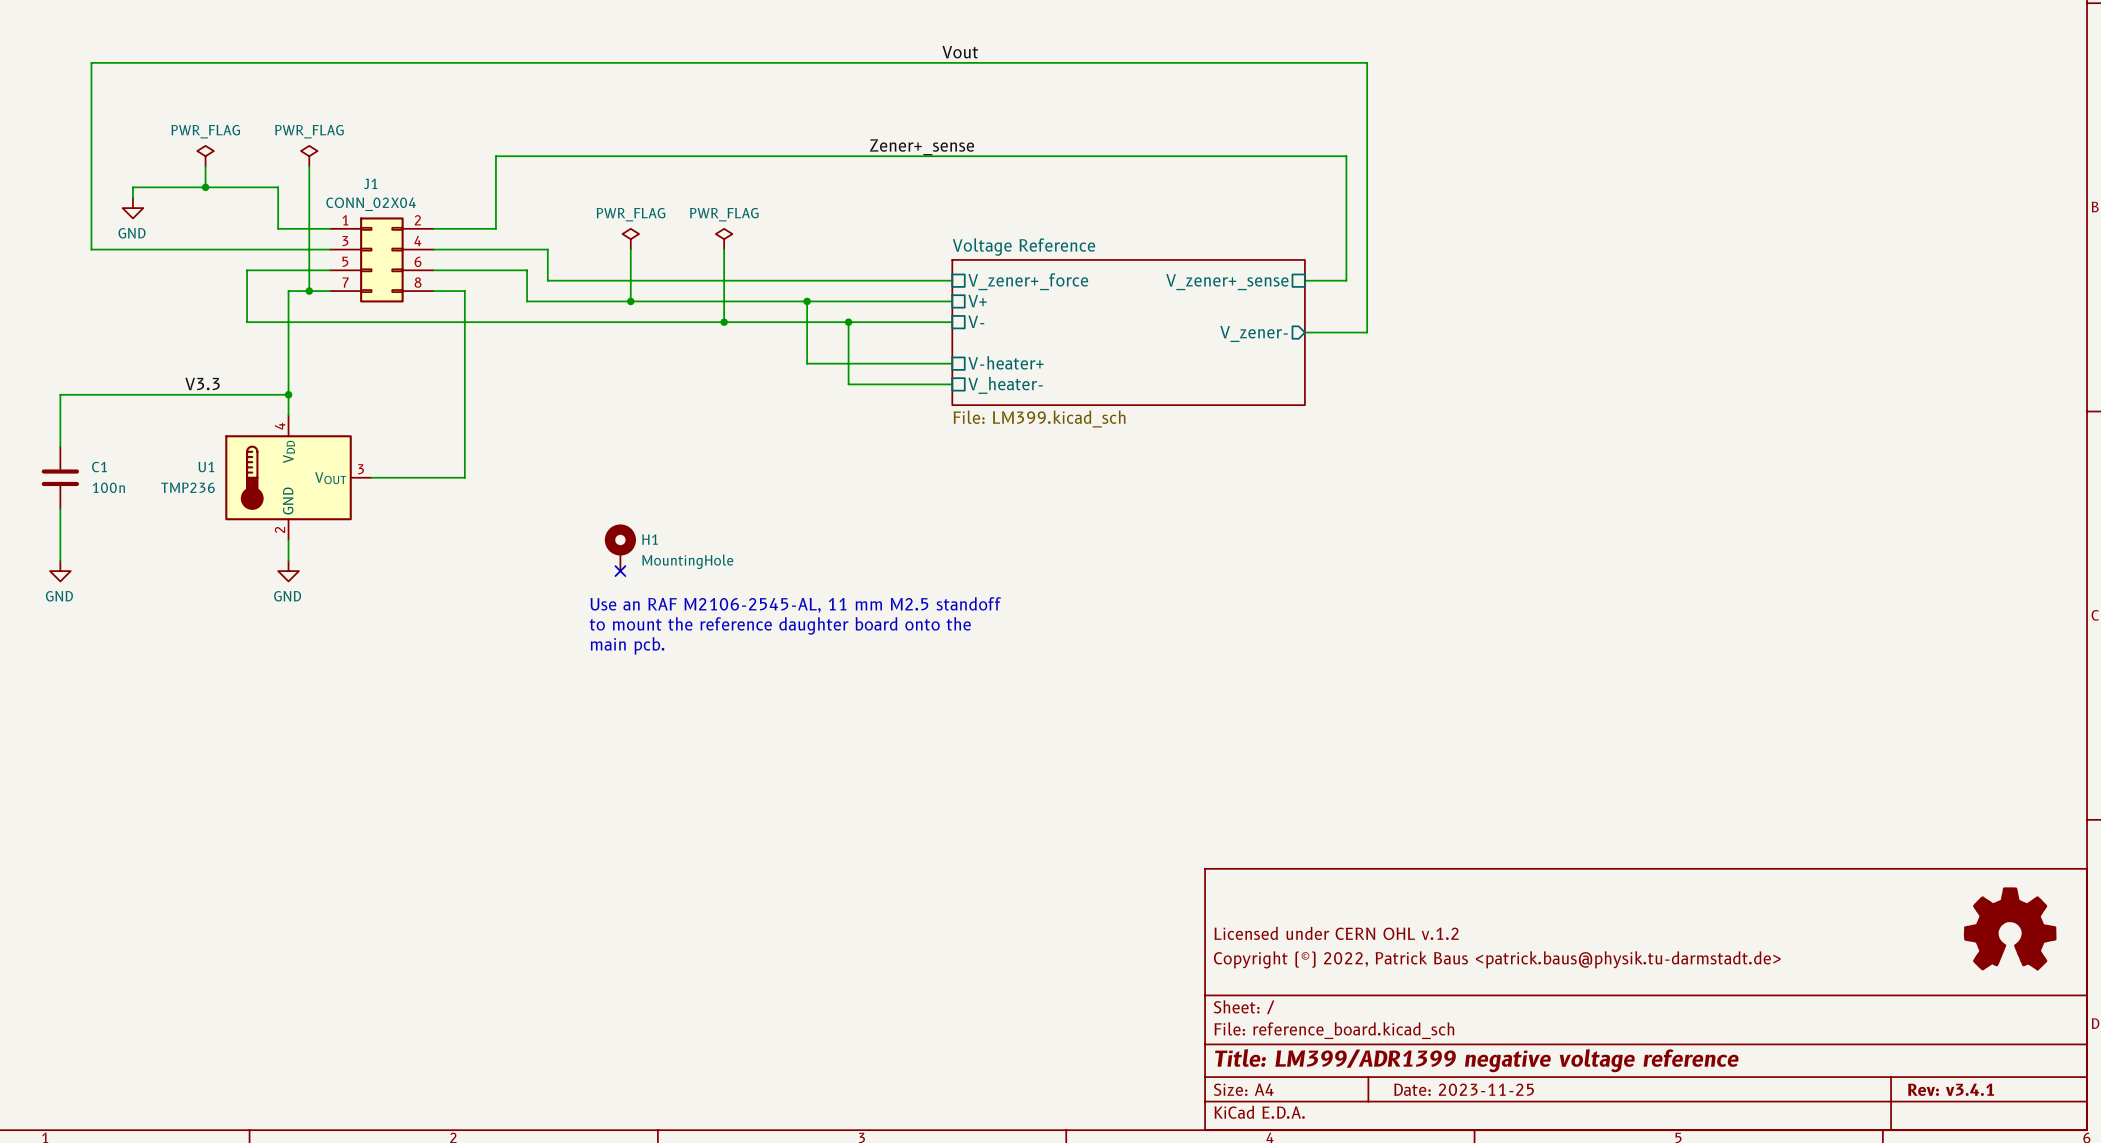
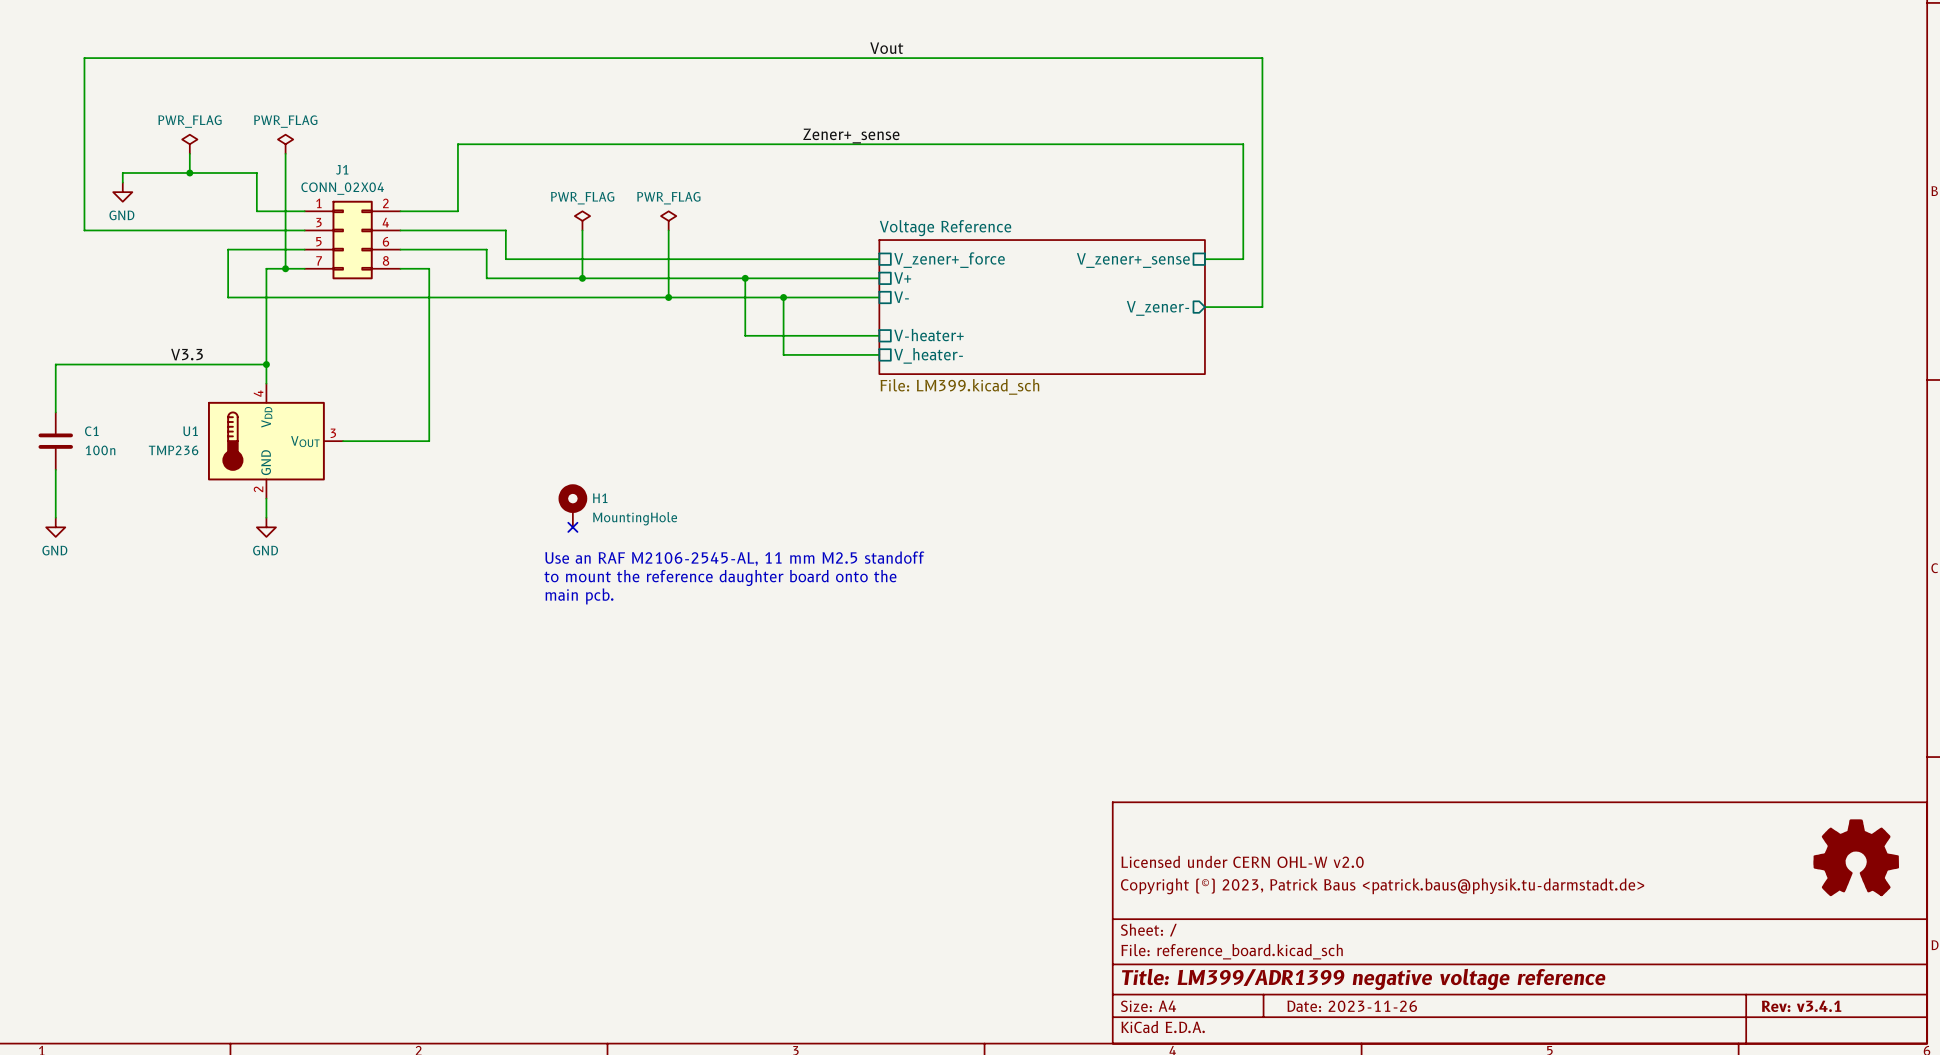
title block: Licensed under CERN OHL v.1.2 (1336, 933) -> Licensed under CERN OHL-W v2.0 (1242, 861)
title block: Copyright (©) 2022, Patrick Baus <patrick.baus@physik.tu-darmstadt.de> (1497, 959) -> Copyright (©) 2023, Patrick Baus <patrick.baus@physik.tu-darmstadt.de> (1382, 886)
title block: Date: 2023-11-25 (1464, 1089) -> Date: 2023-11-26 (1352, 1006)

